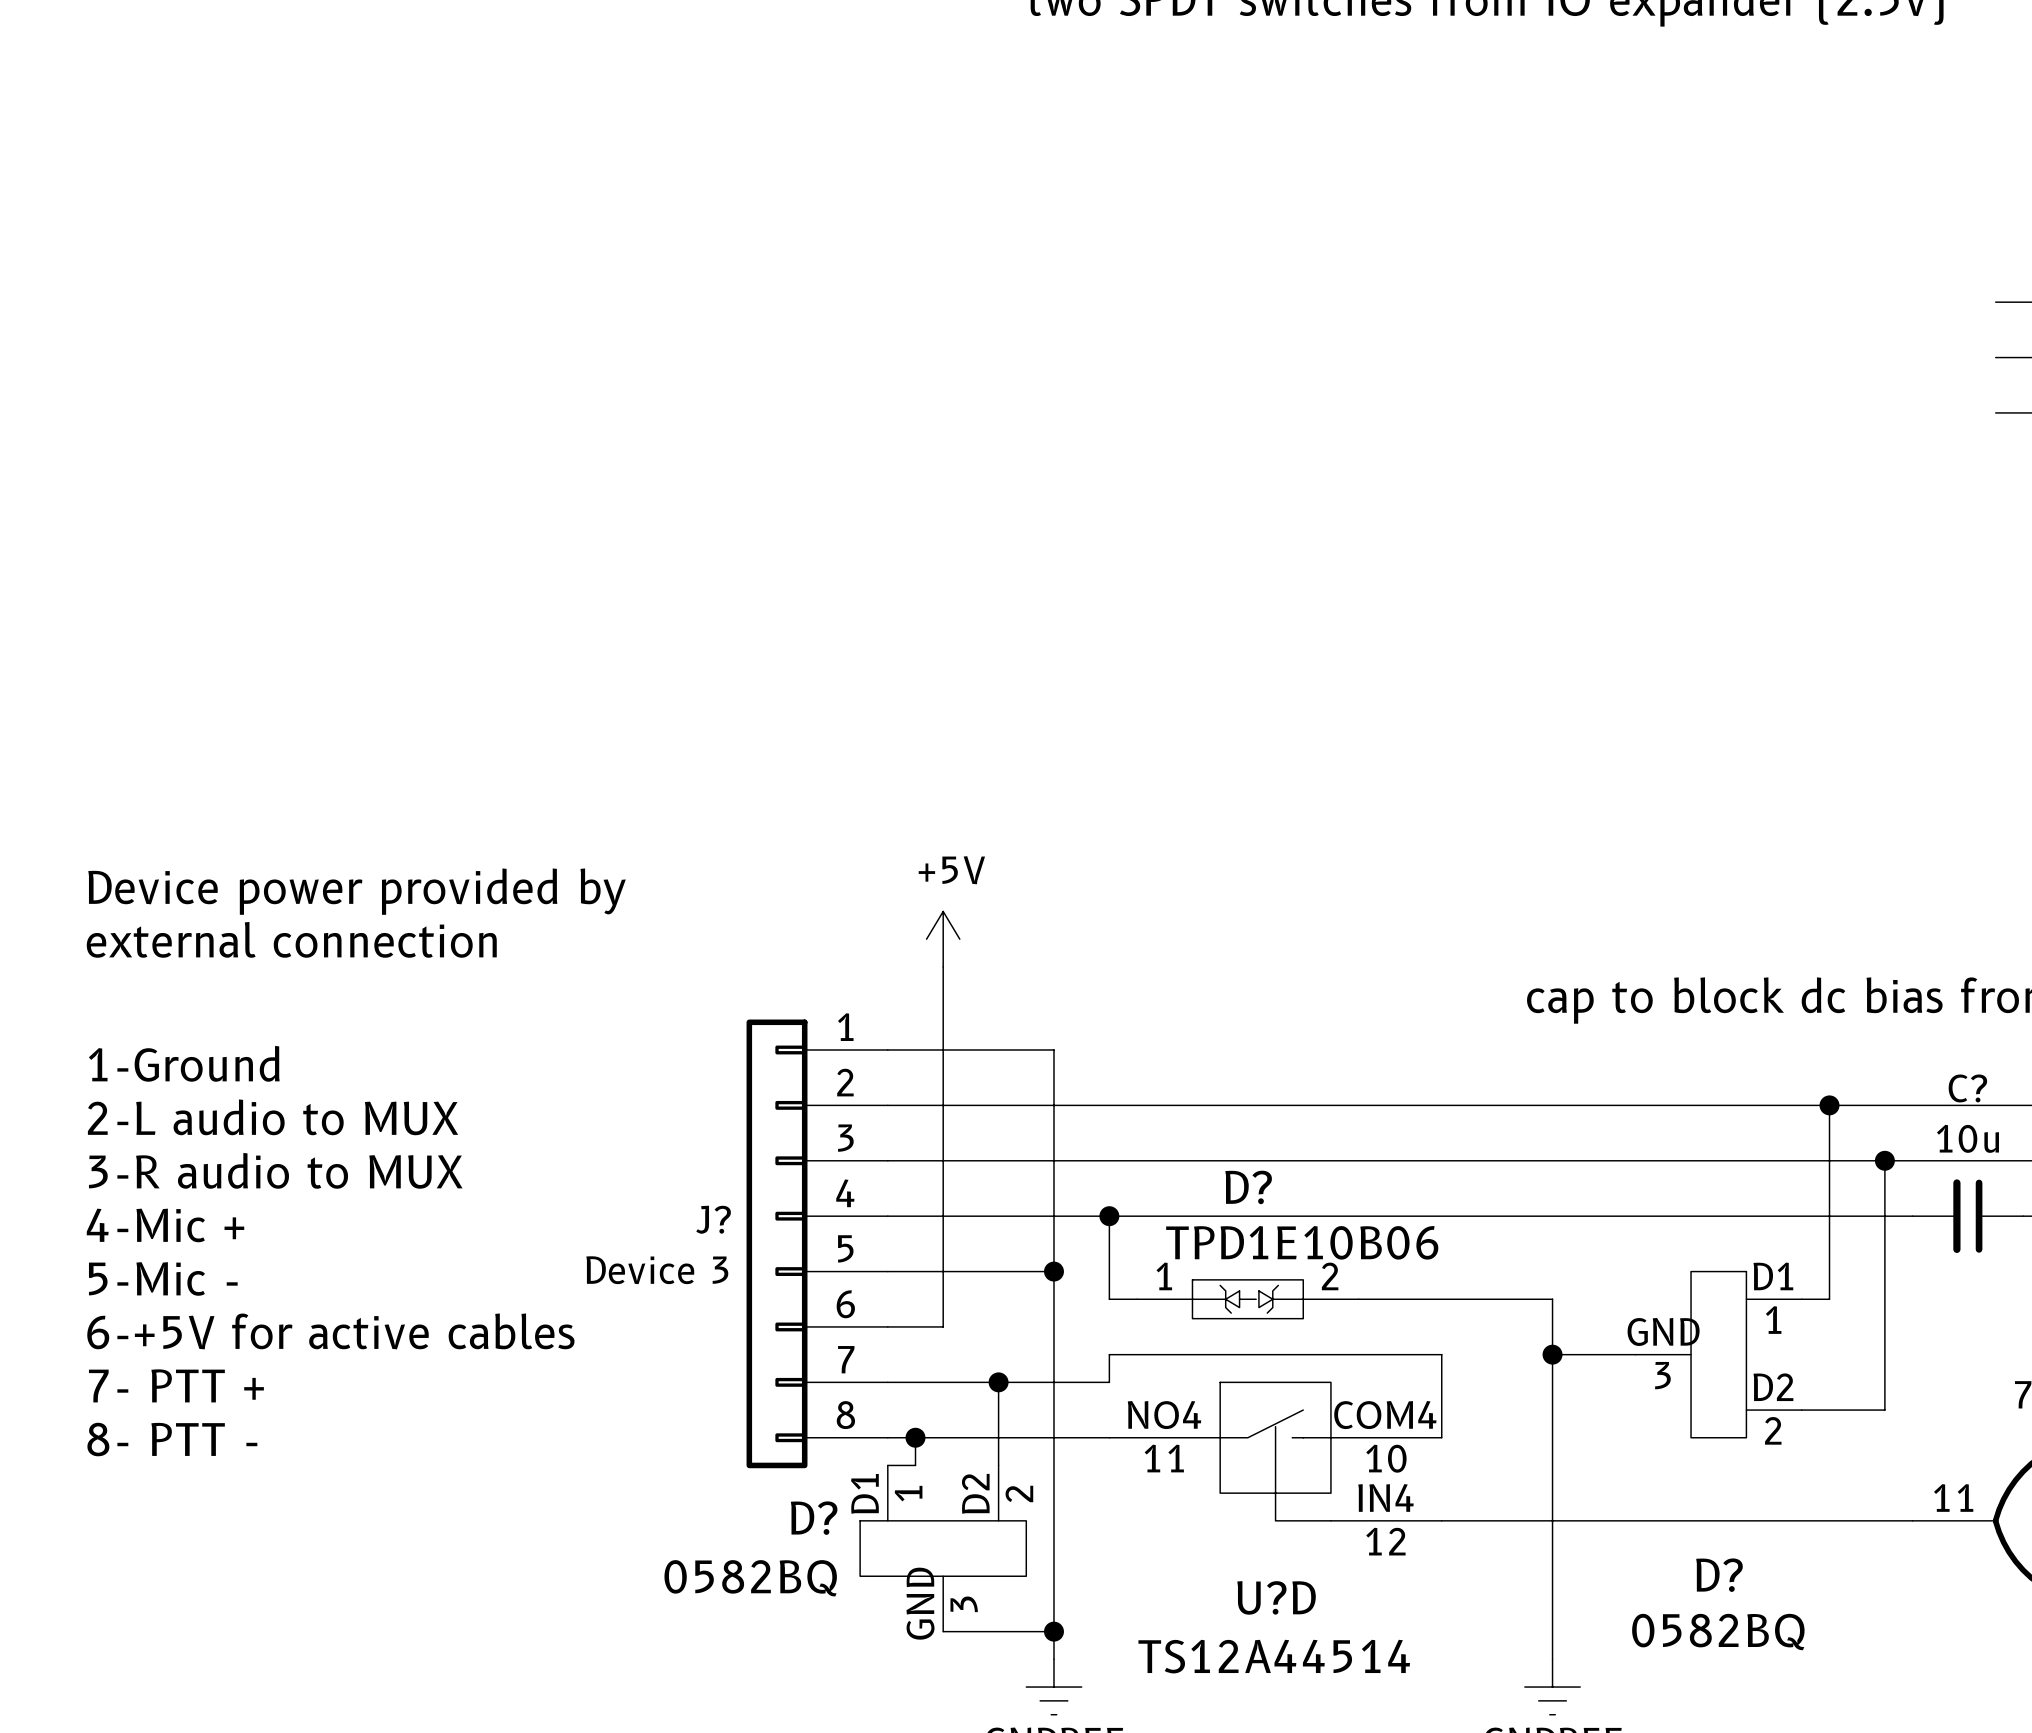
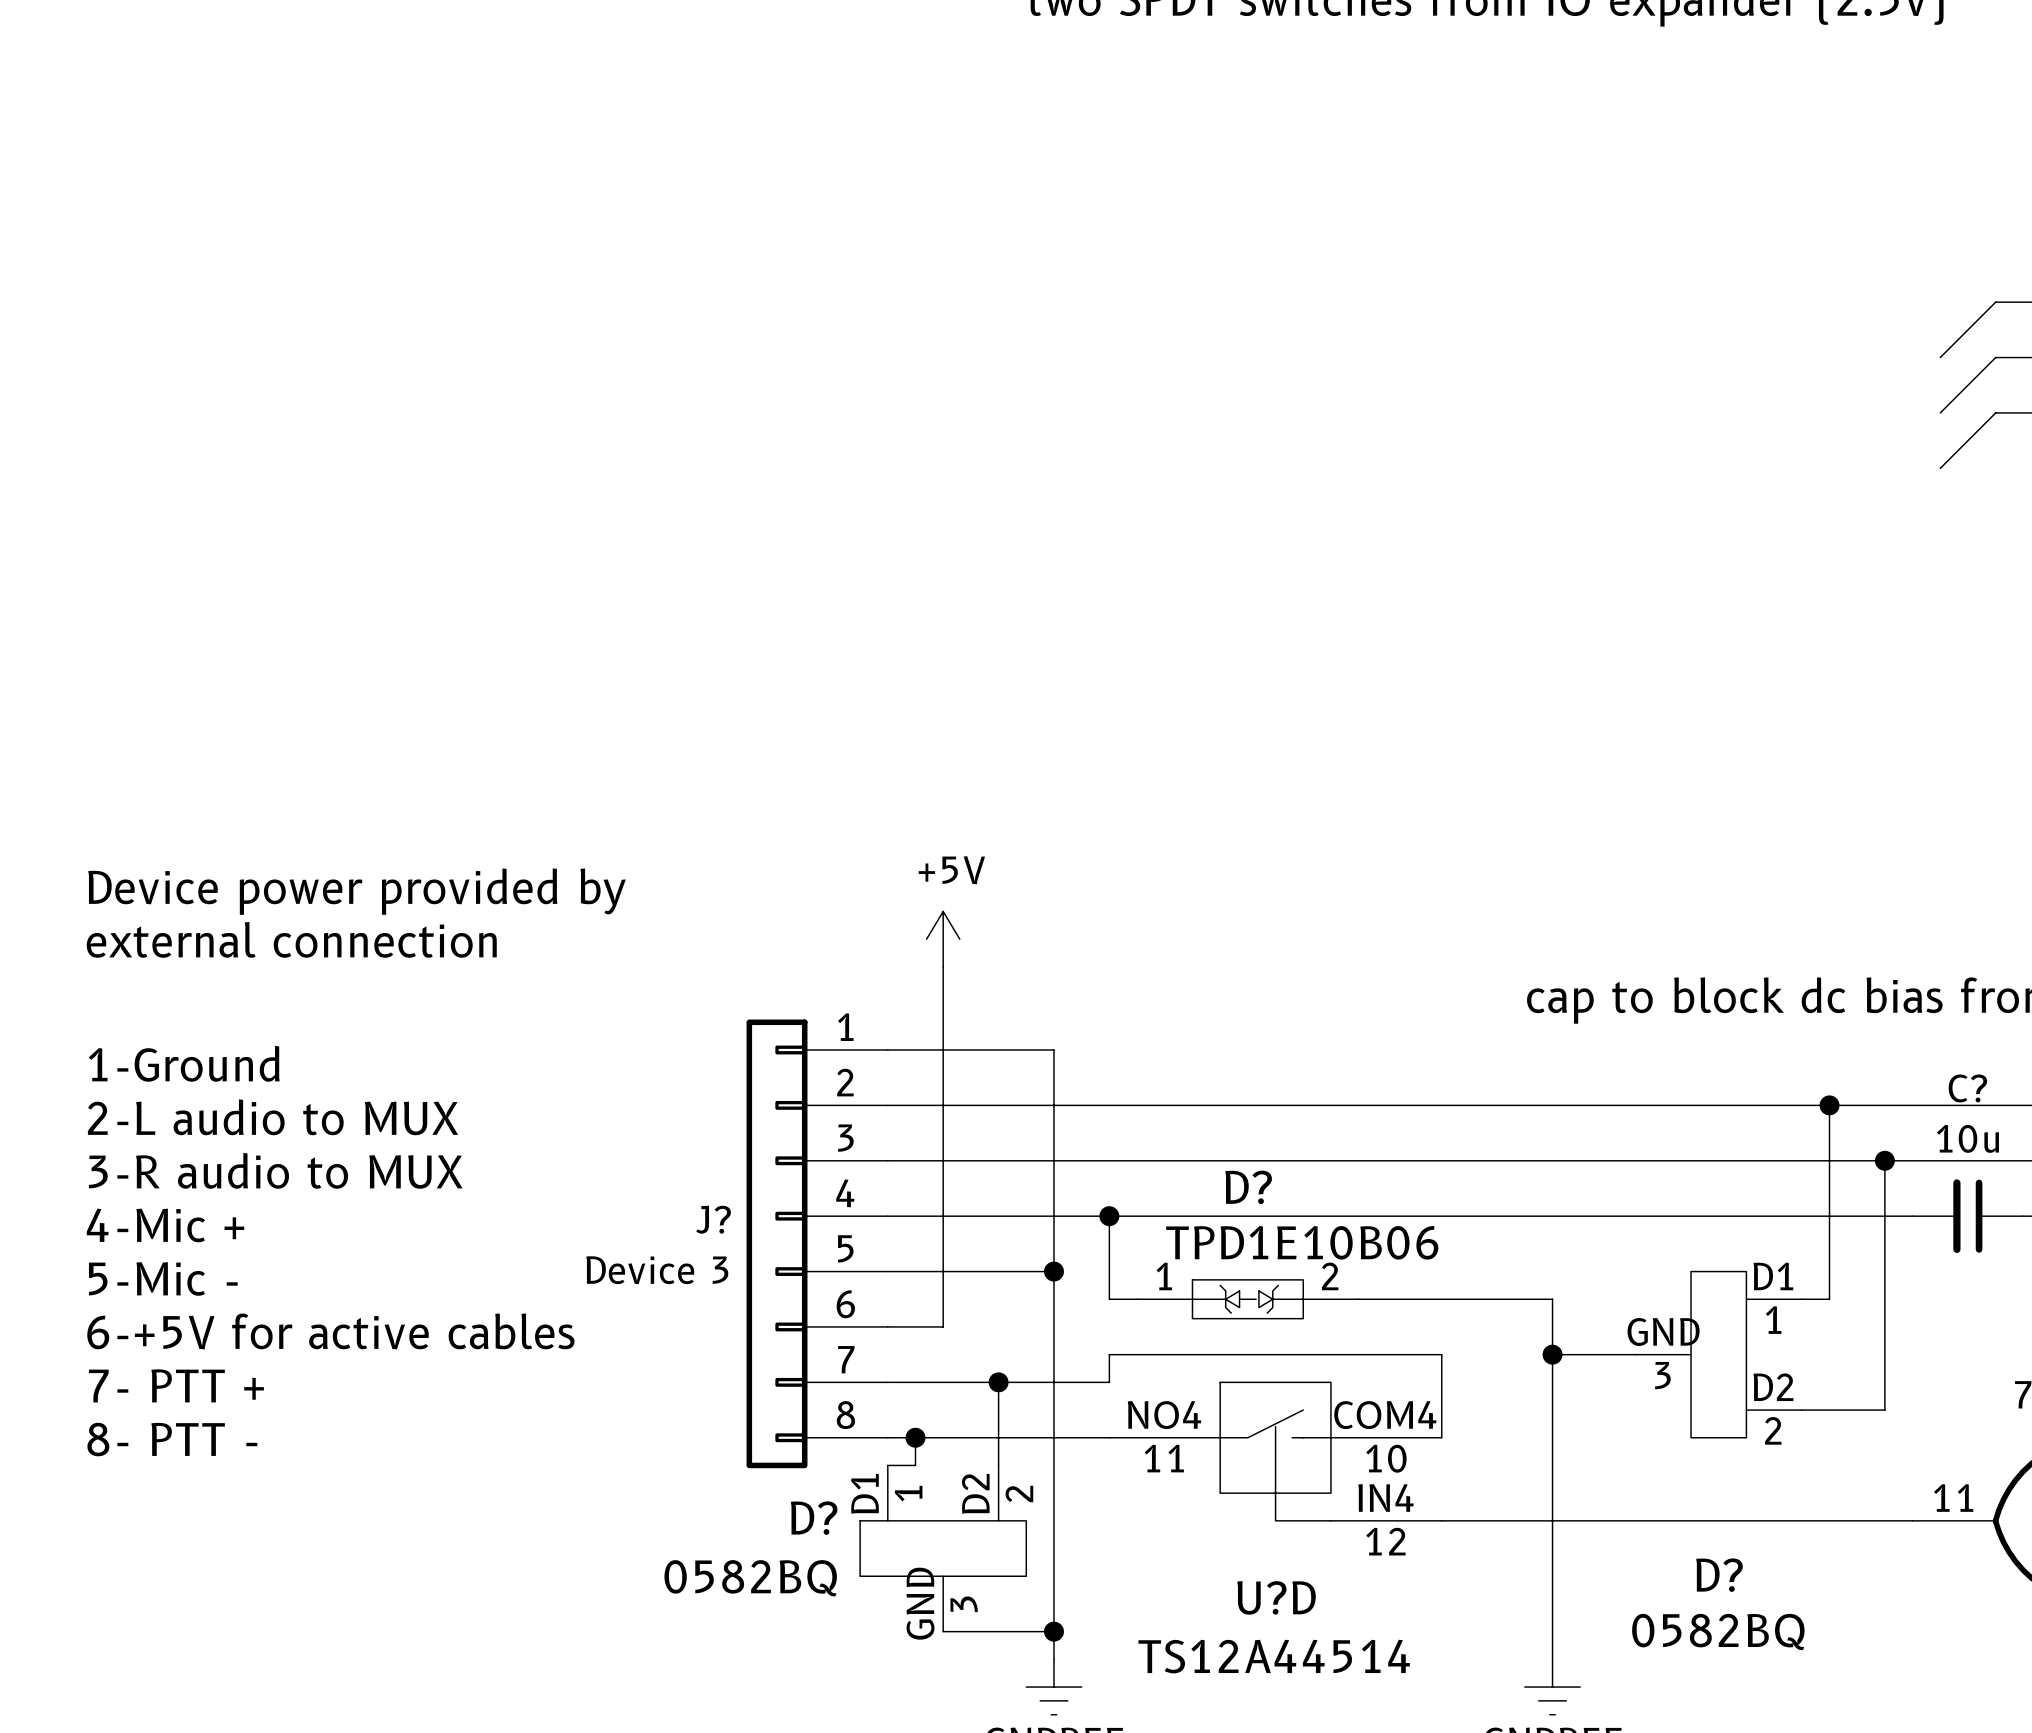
wire: none -> (1995, 302) (1940, 357)
wire: none -> (1995, 357) (1940, 412)
wire: none -> (1995, 412) (1940, 468)

